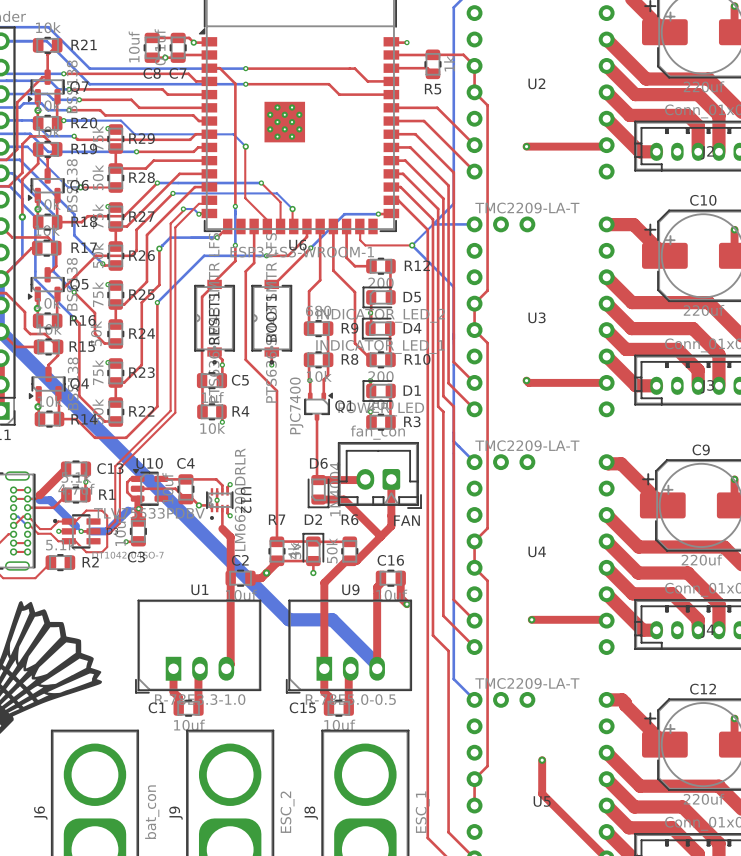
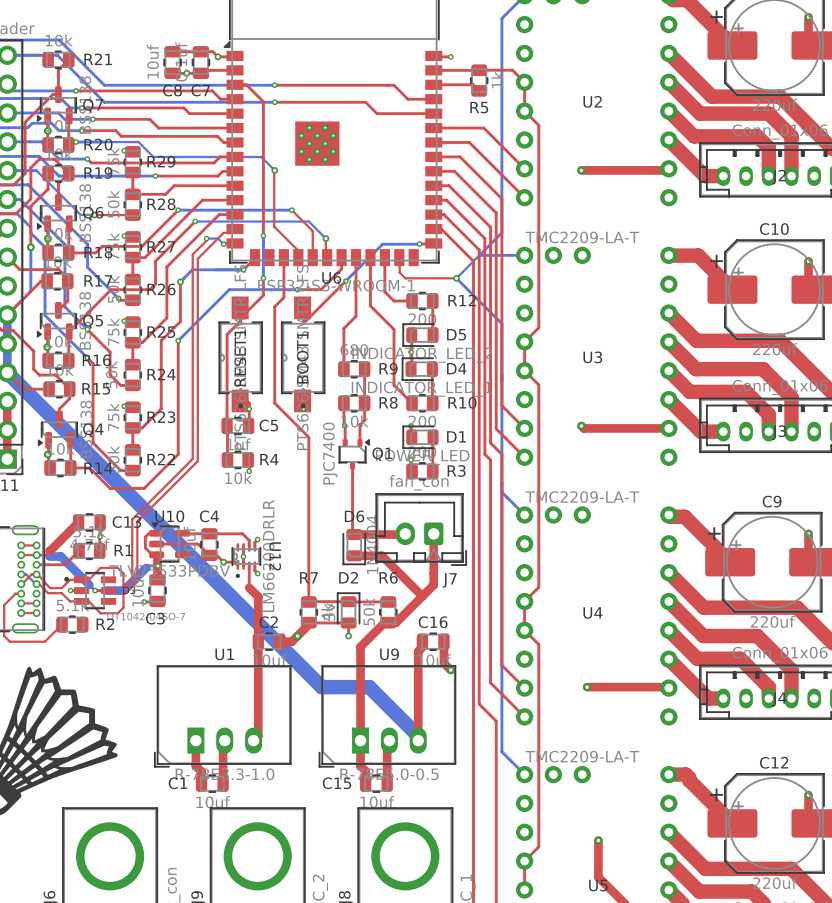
RESET1 footprint: [194, 279, 235, 365] -> [218, 296, 263, 413]
BOOT1 footprint: [251, 279, 293, 365] -> [280, 296, 326, 413]
FAN name: FAN (406, 520) -> J7 (449, 580)

